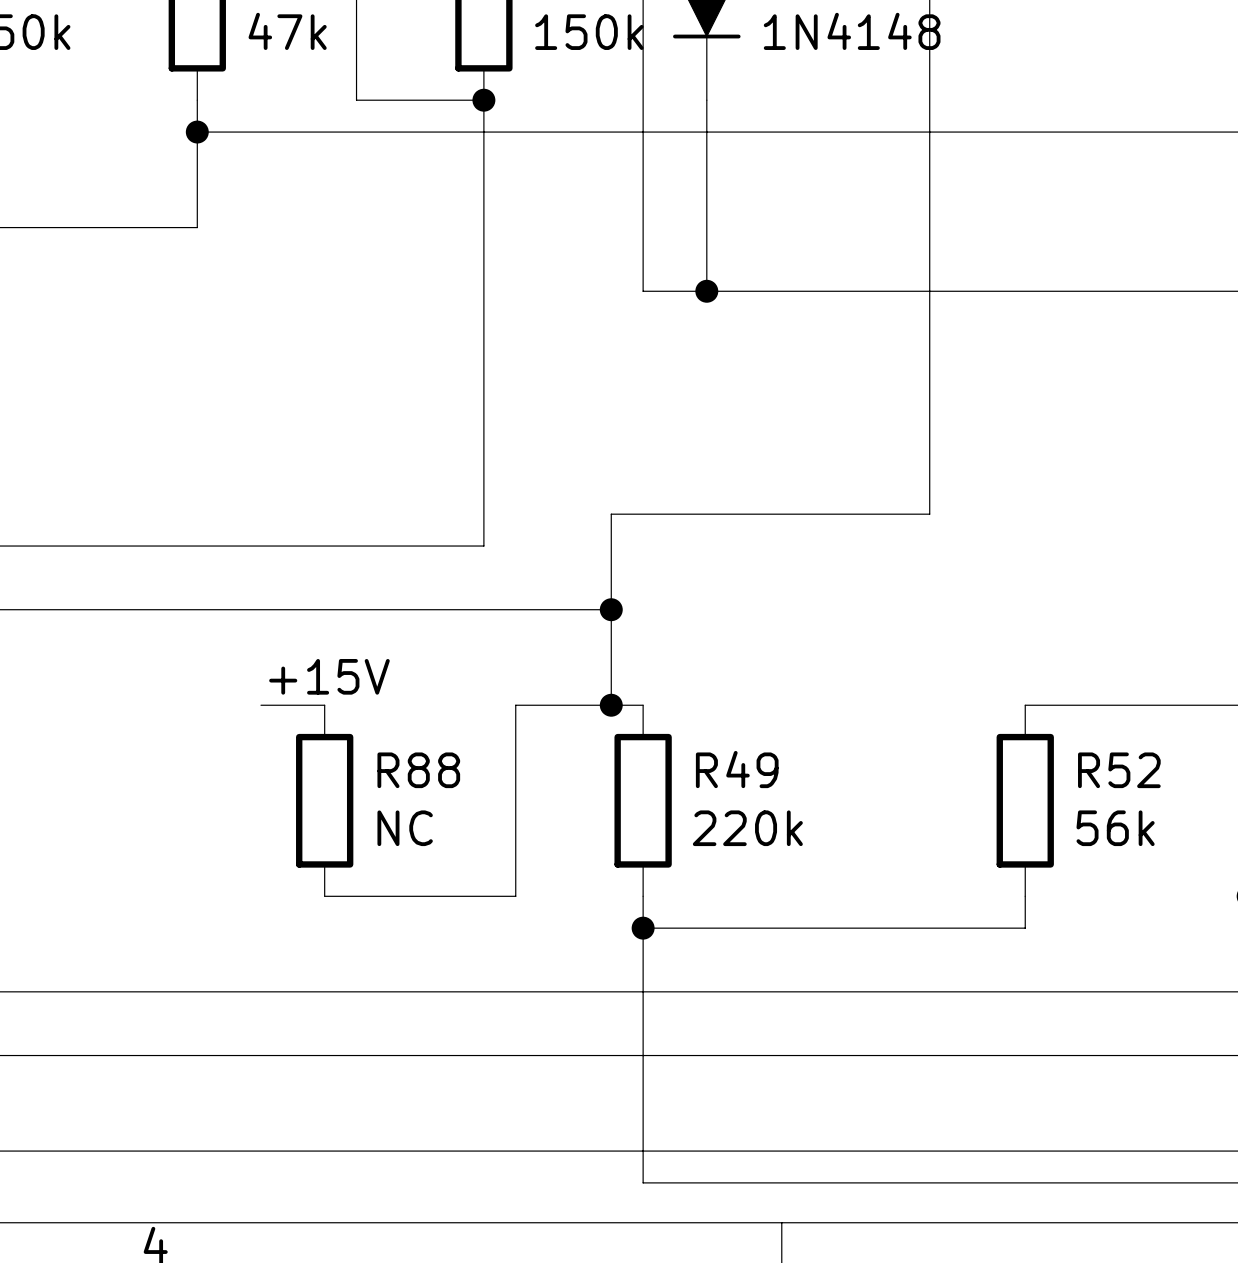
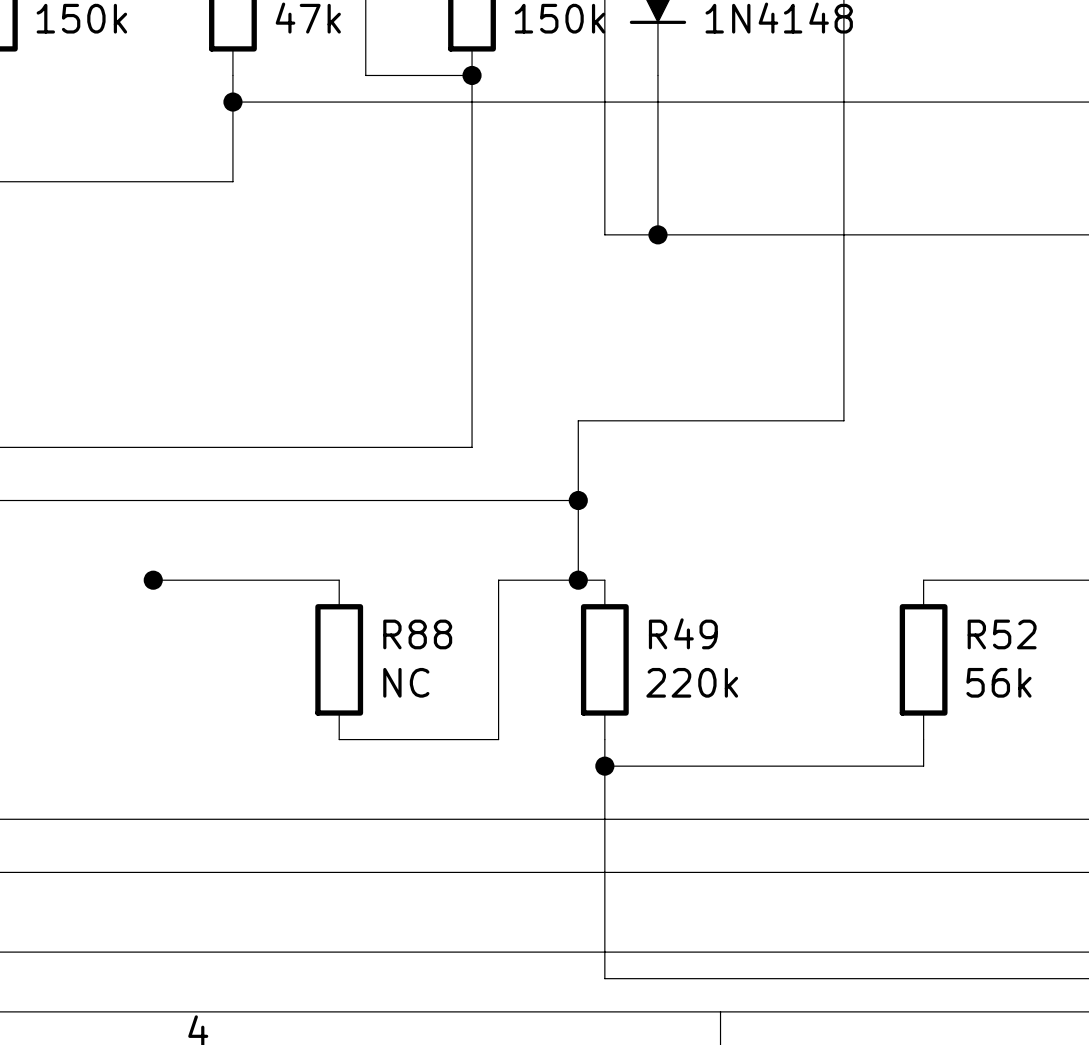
label: +15V (329, 676) -> none
wire: none -> (153, 580) (286, 580)
junction: none -> (153, 580)

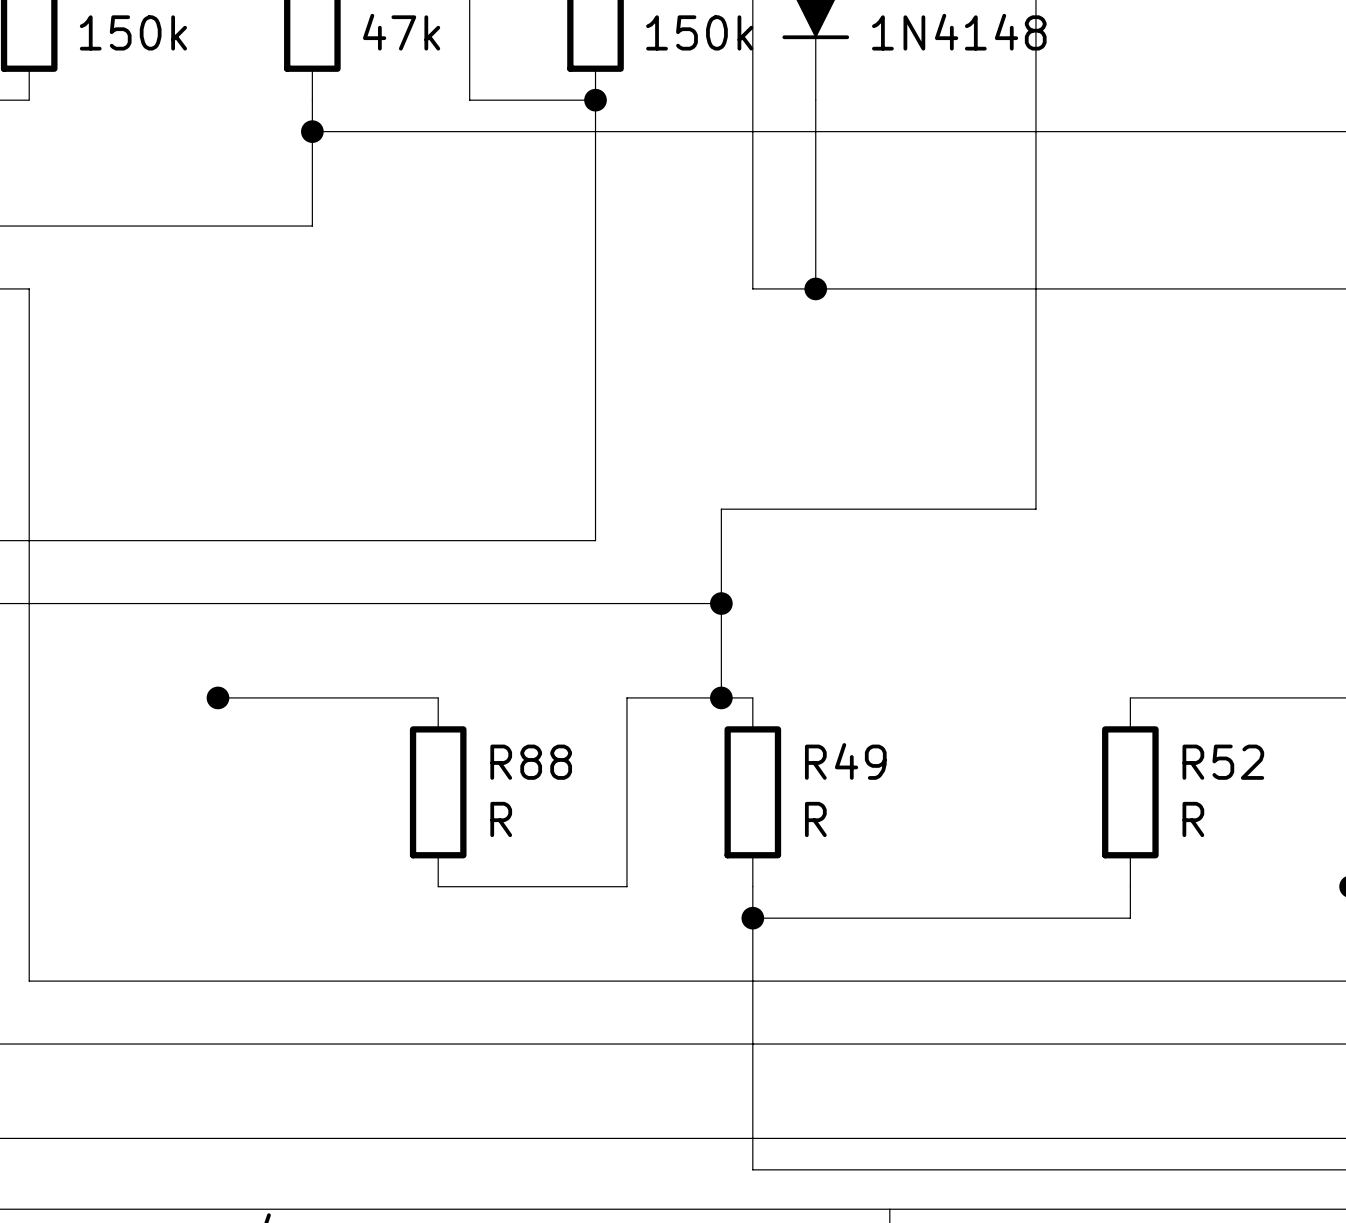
R88 value: NC (406, 682) -> R (501, 819)
R49 value: 220k (692, 682) -> R (815, 819)
R52 value: 56k (998, 682) -> R (1193, 819)

